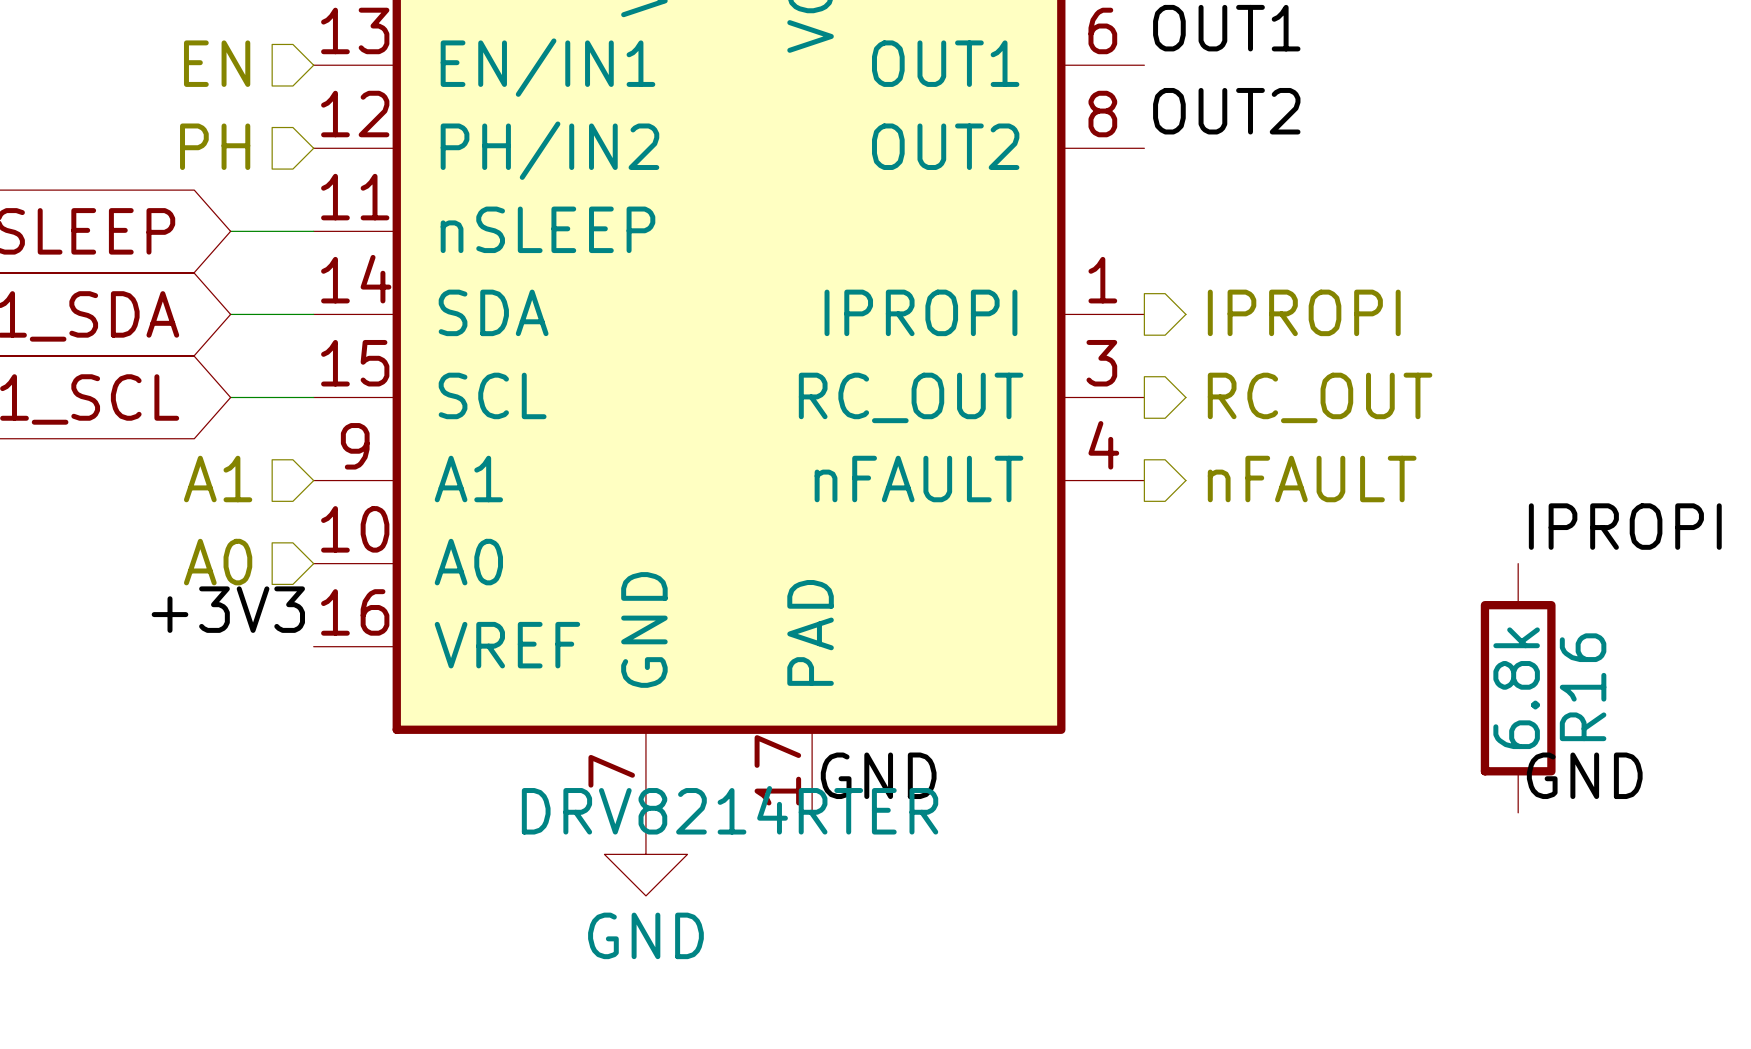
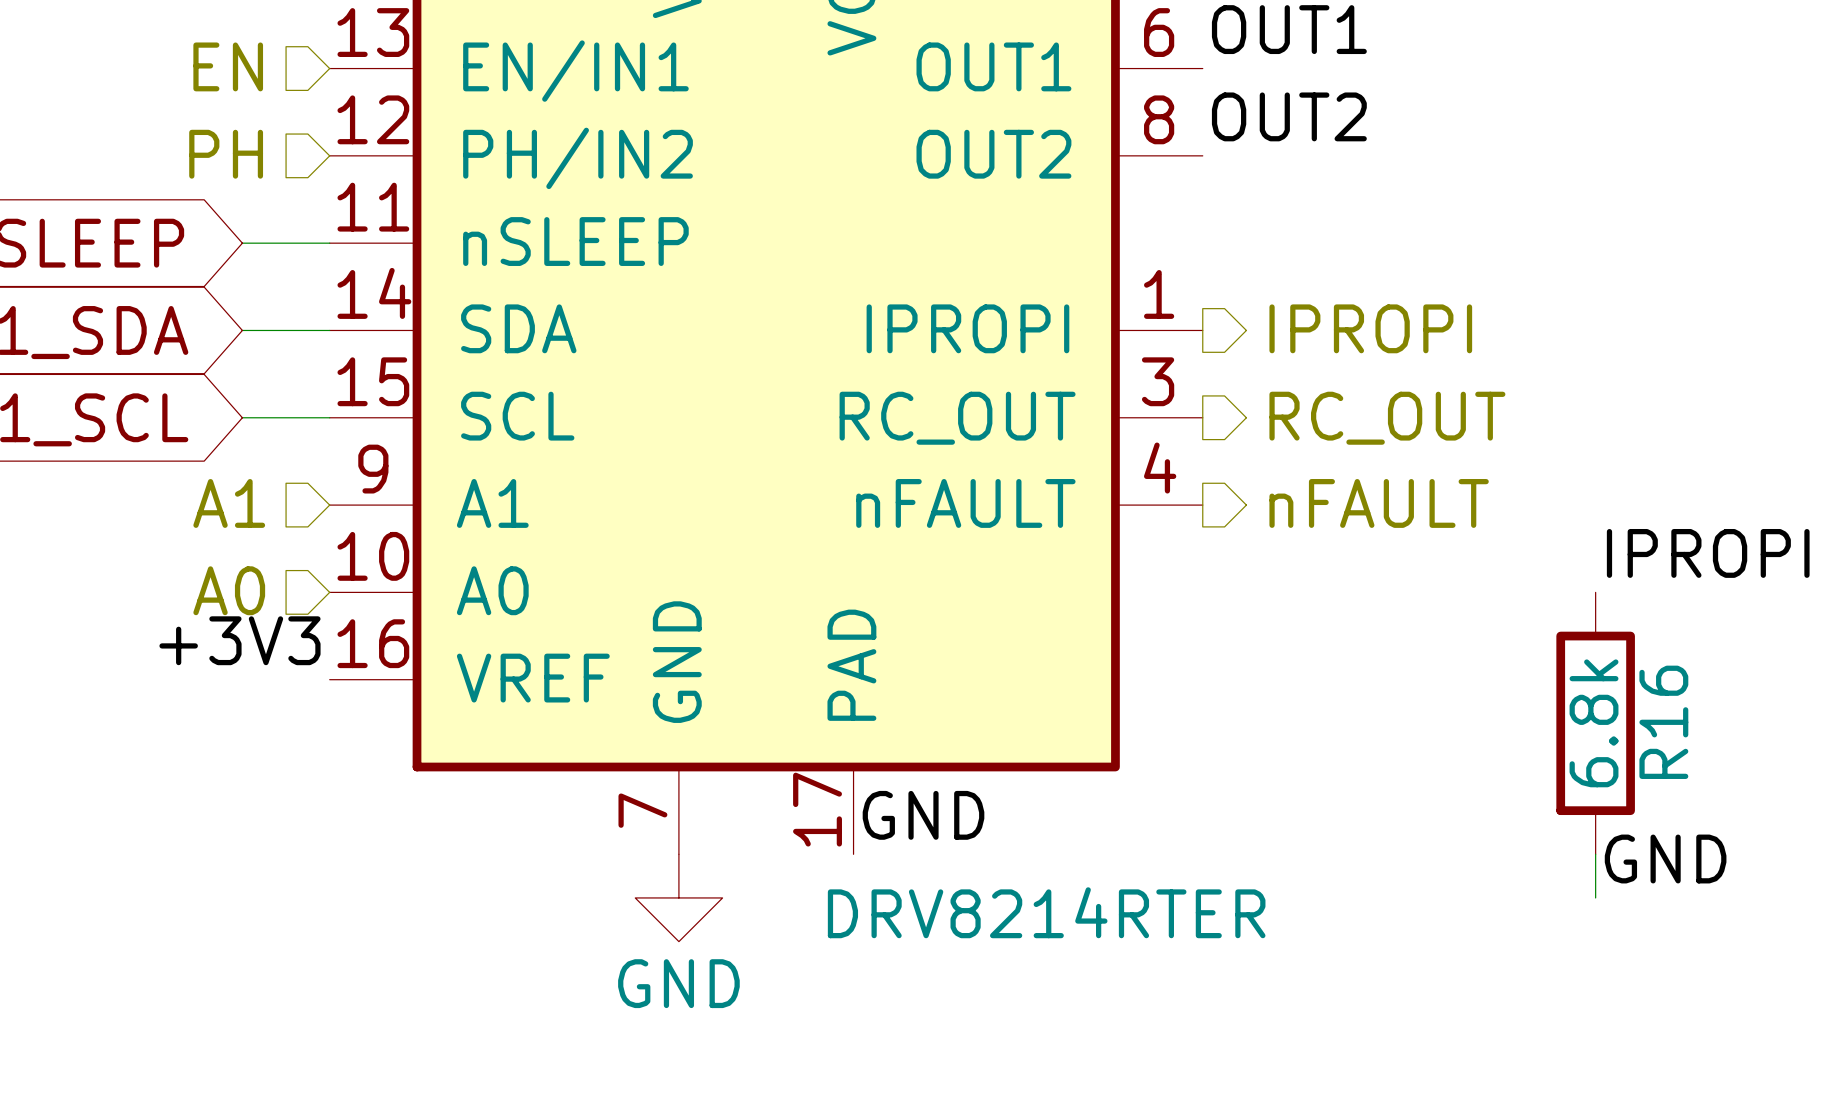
label position: GND (1584, 775) -> GND (1665, 859)
part value position: DRV8214RTER (730, 810) -> DRV8214RTER (1046, 912)
wire: none -> (1595, 854) (1595, 897)

